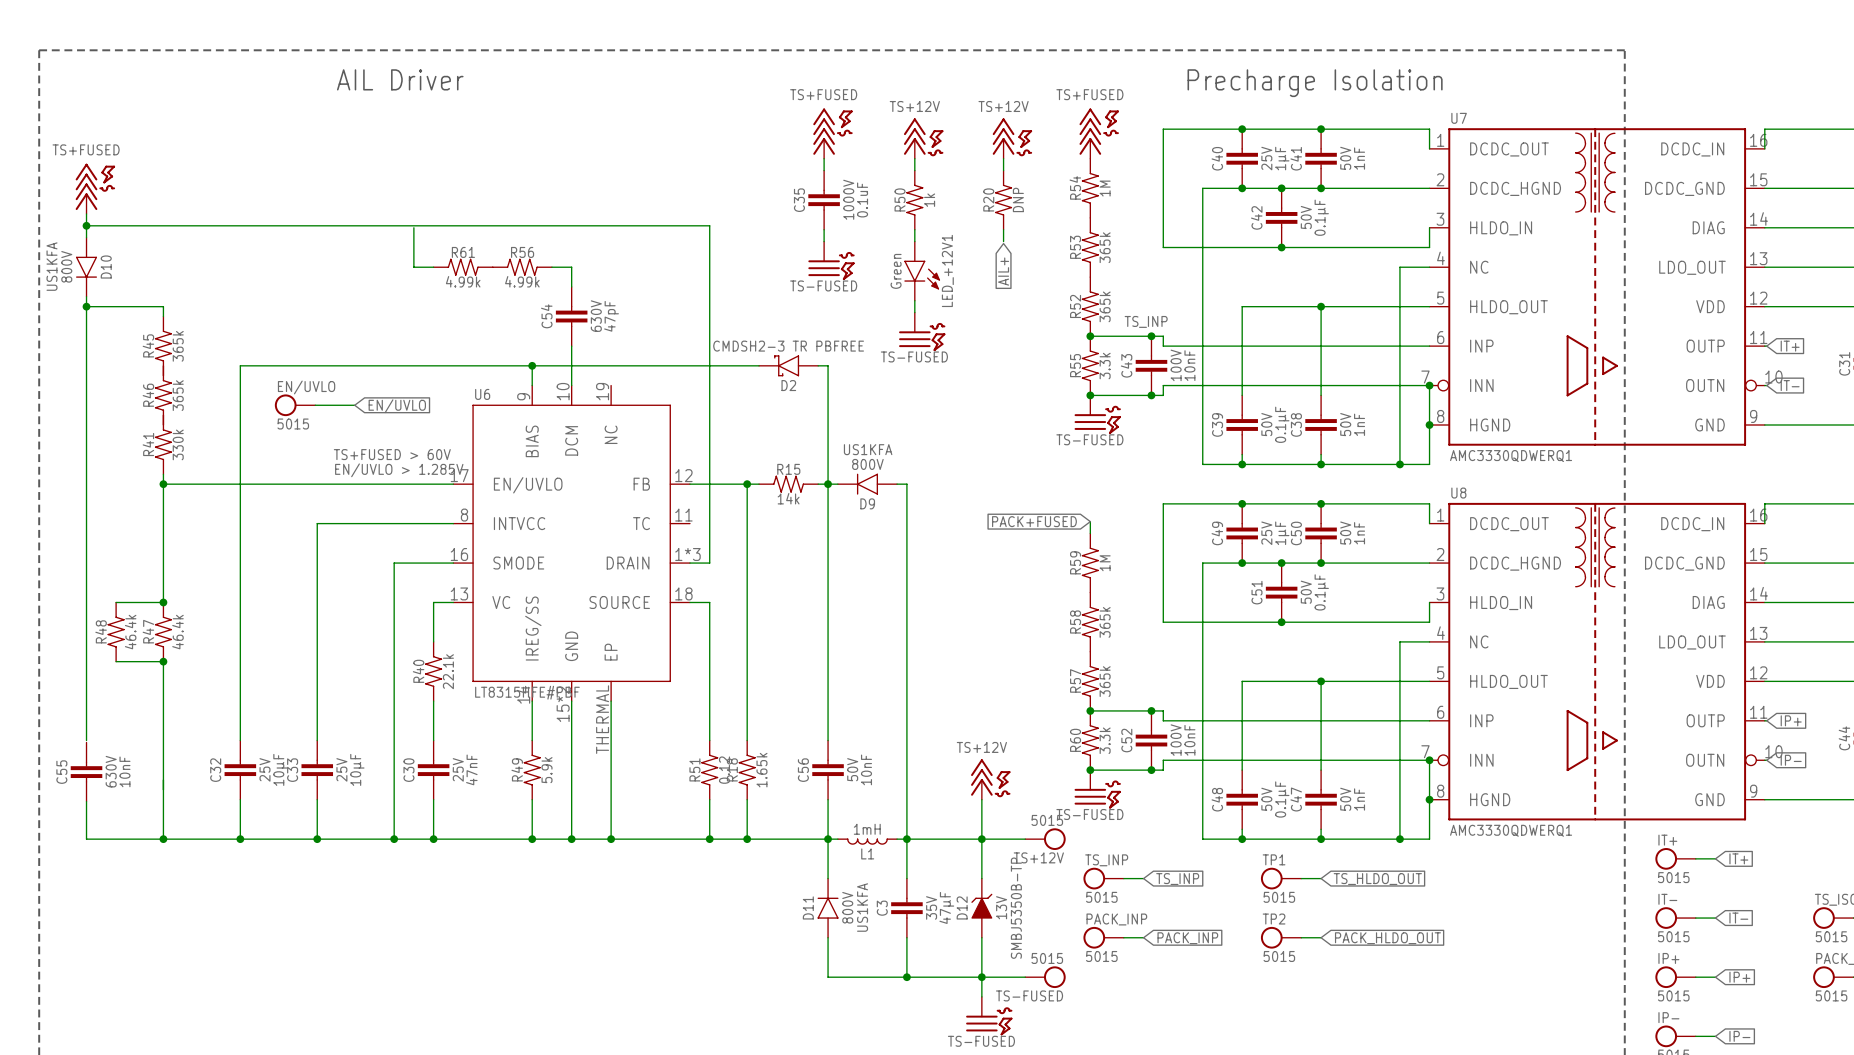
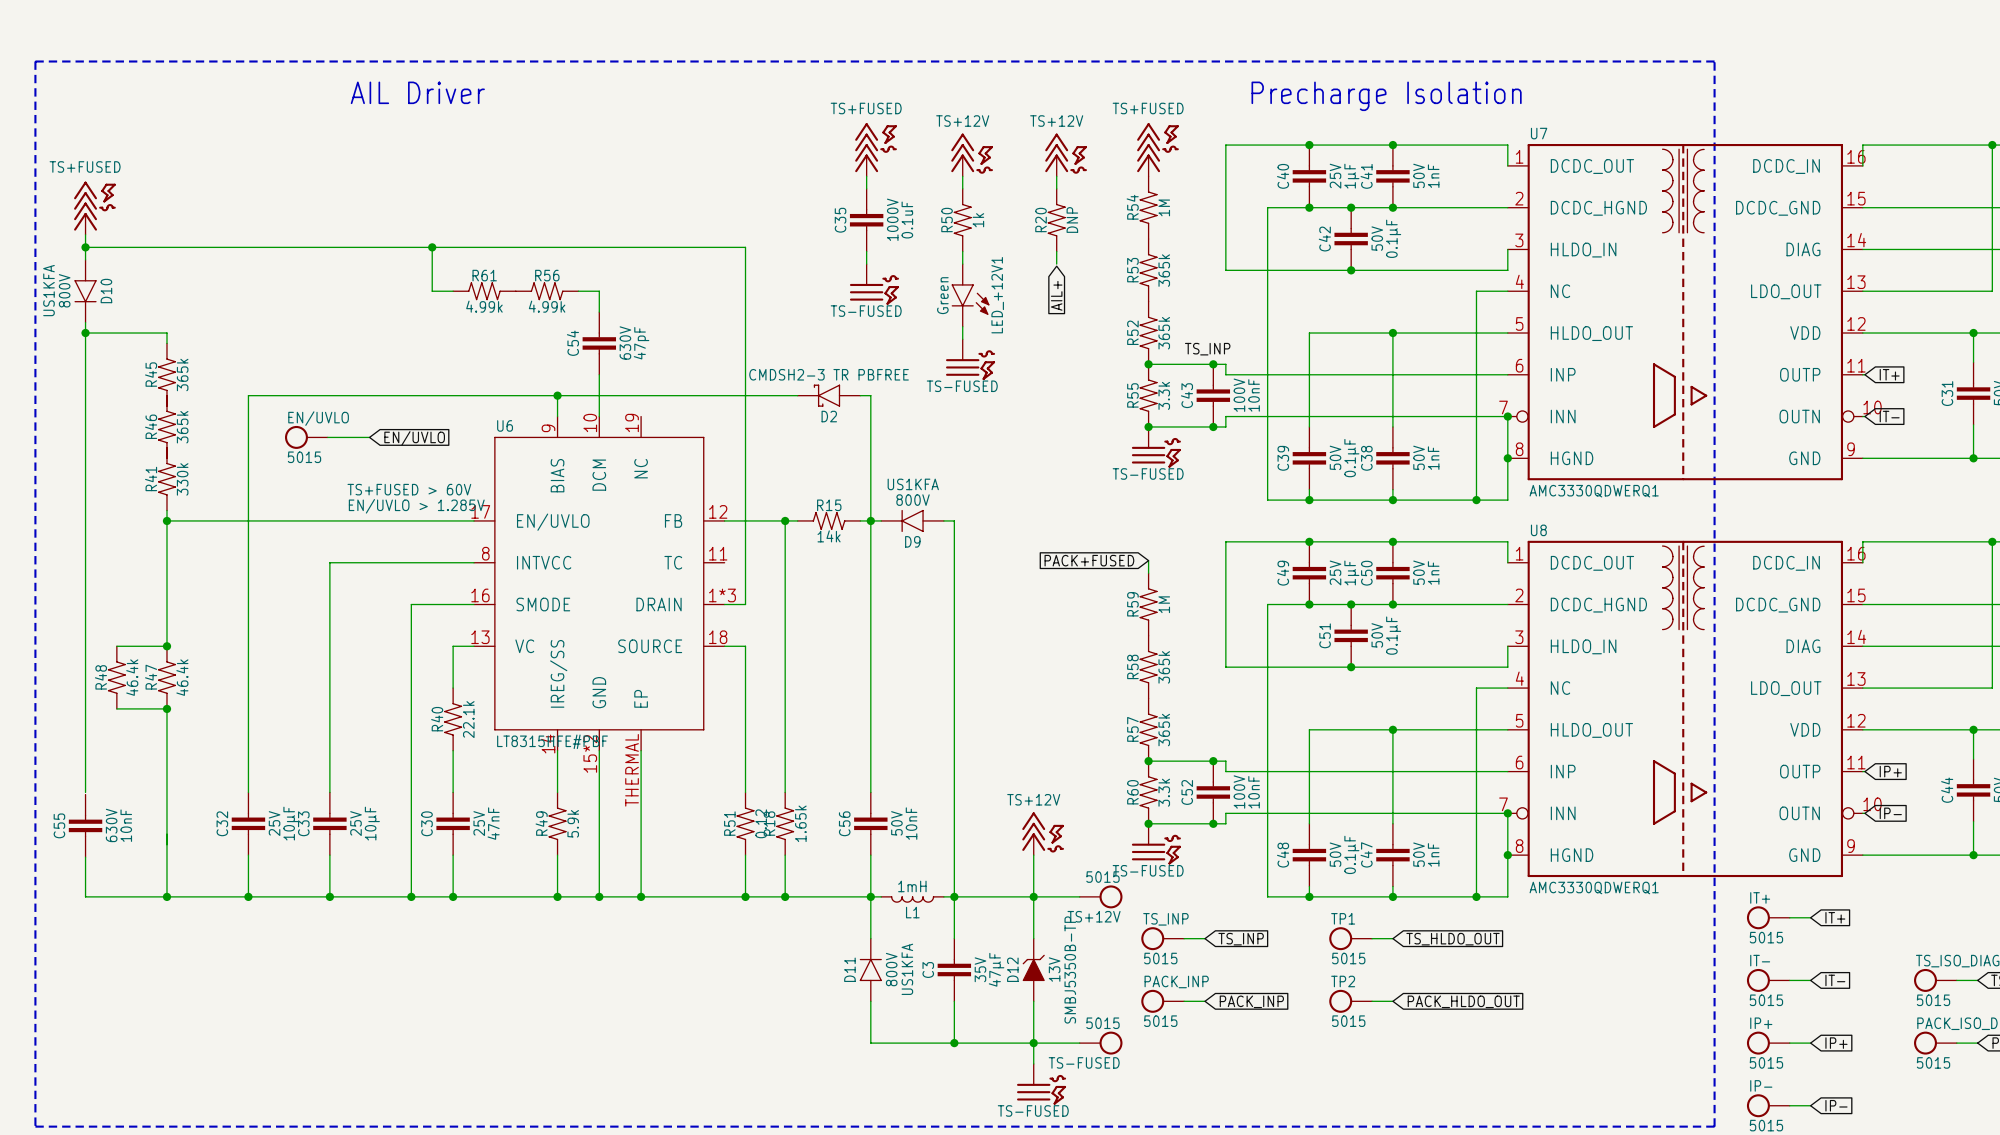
junction: none -> (432, 247)

